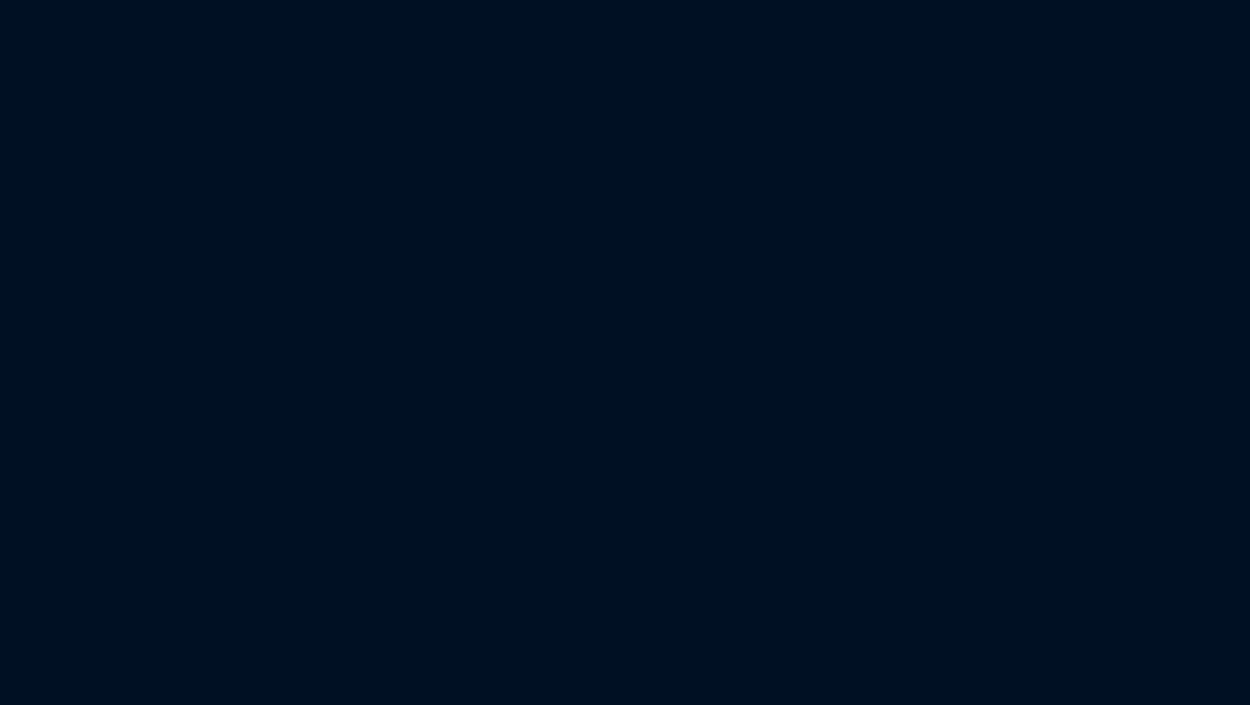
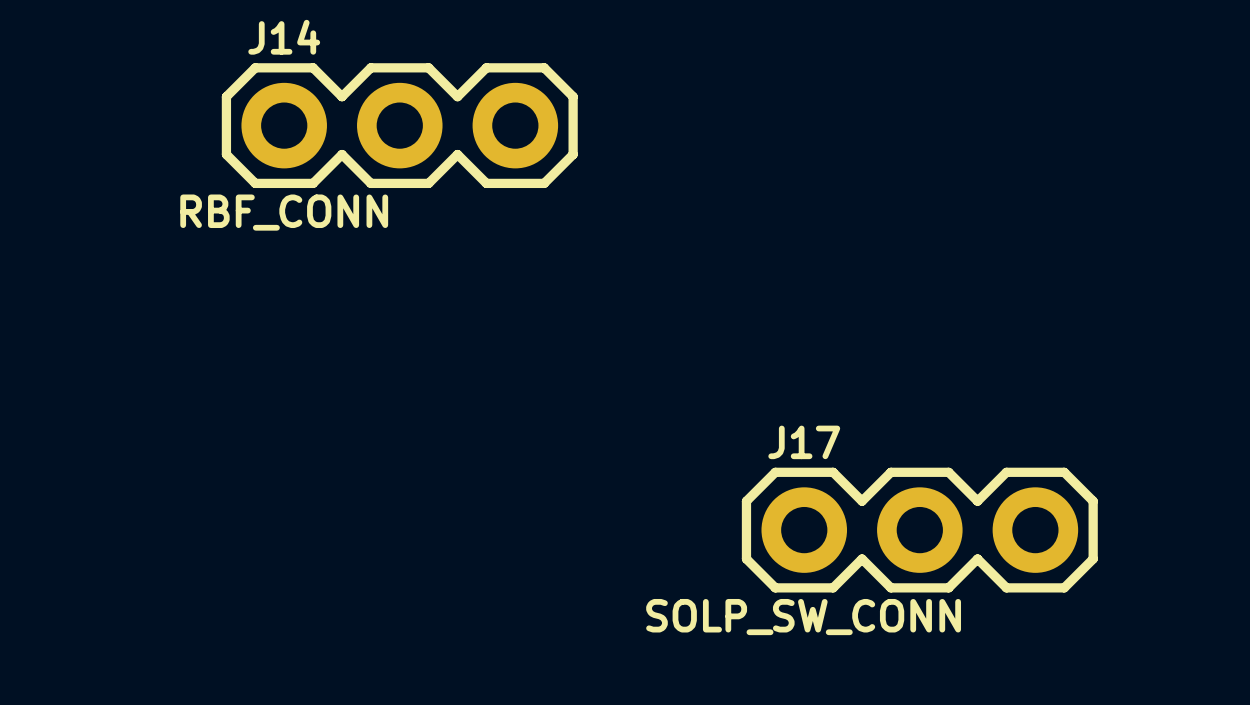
J14: none -> RBF_CONN (399, 125)
J17: none -> SOLP_SW_CONN (919, 530)

